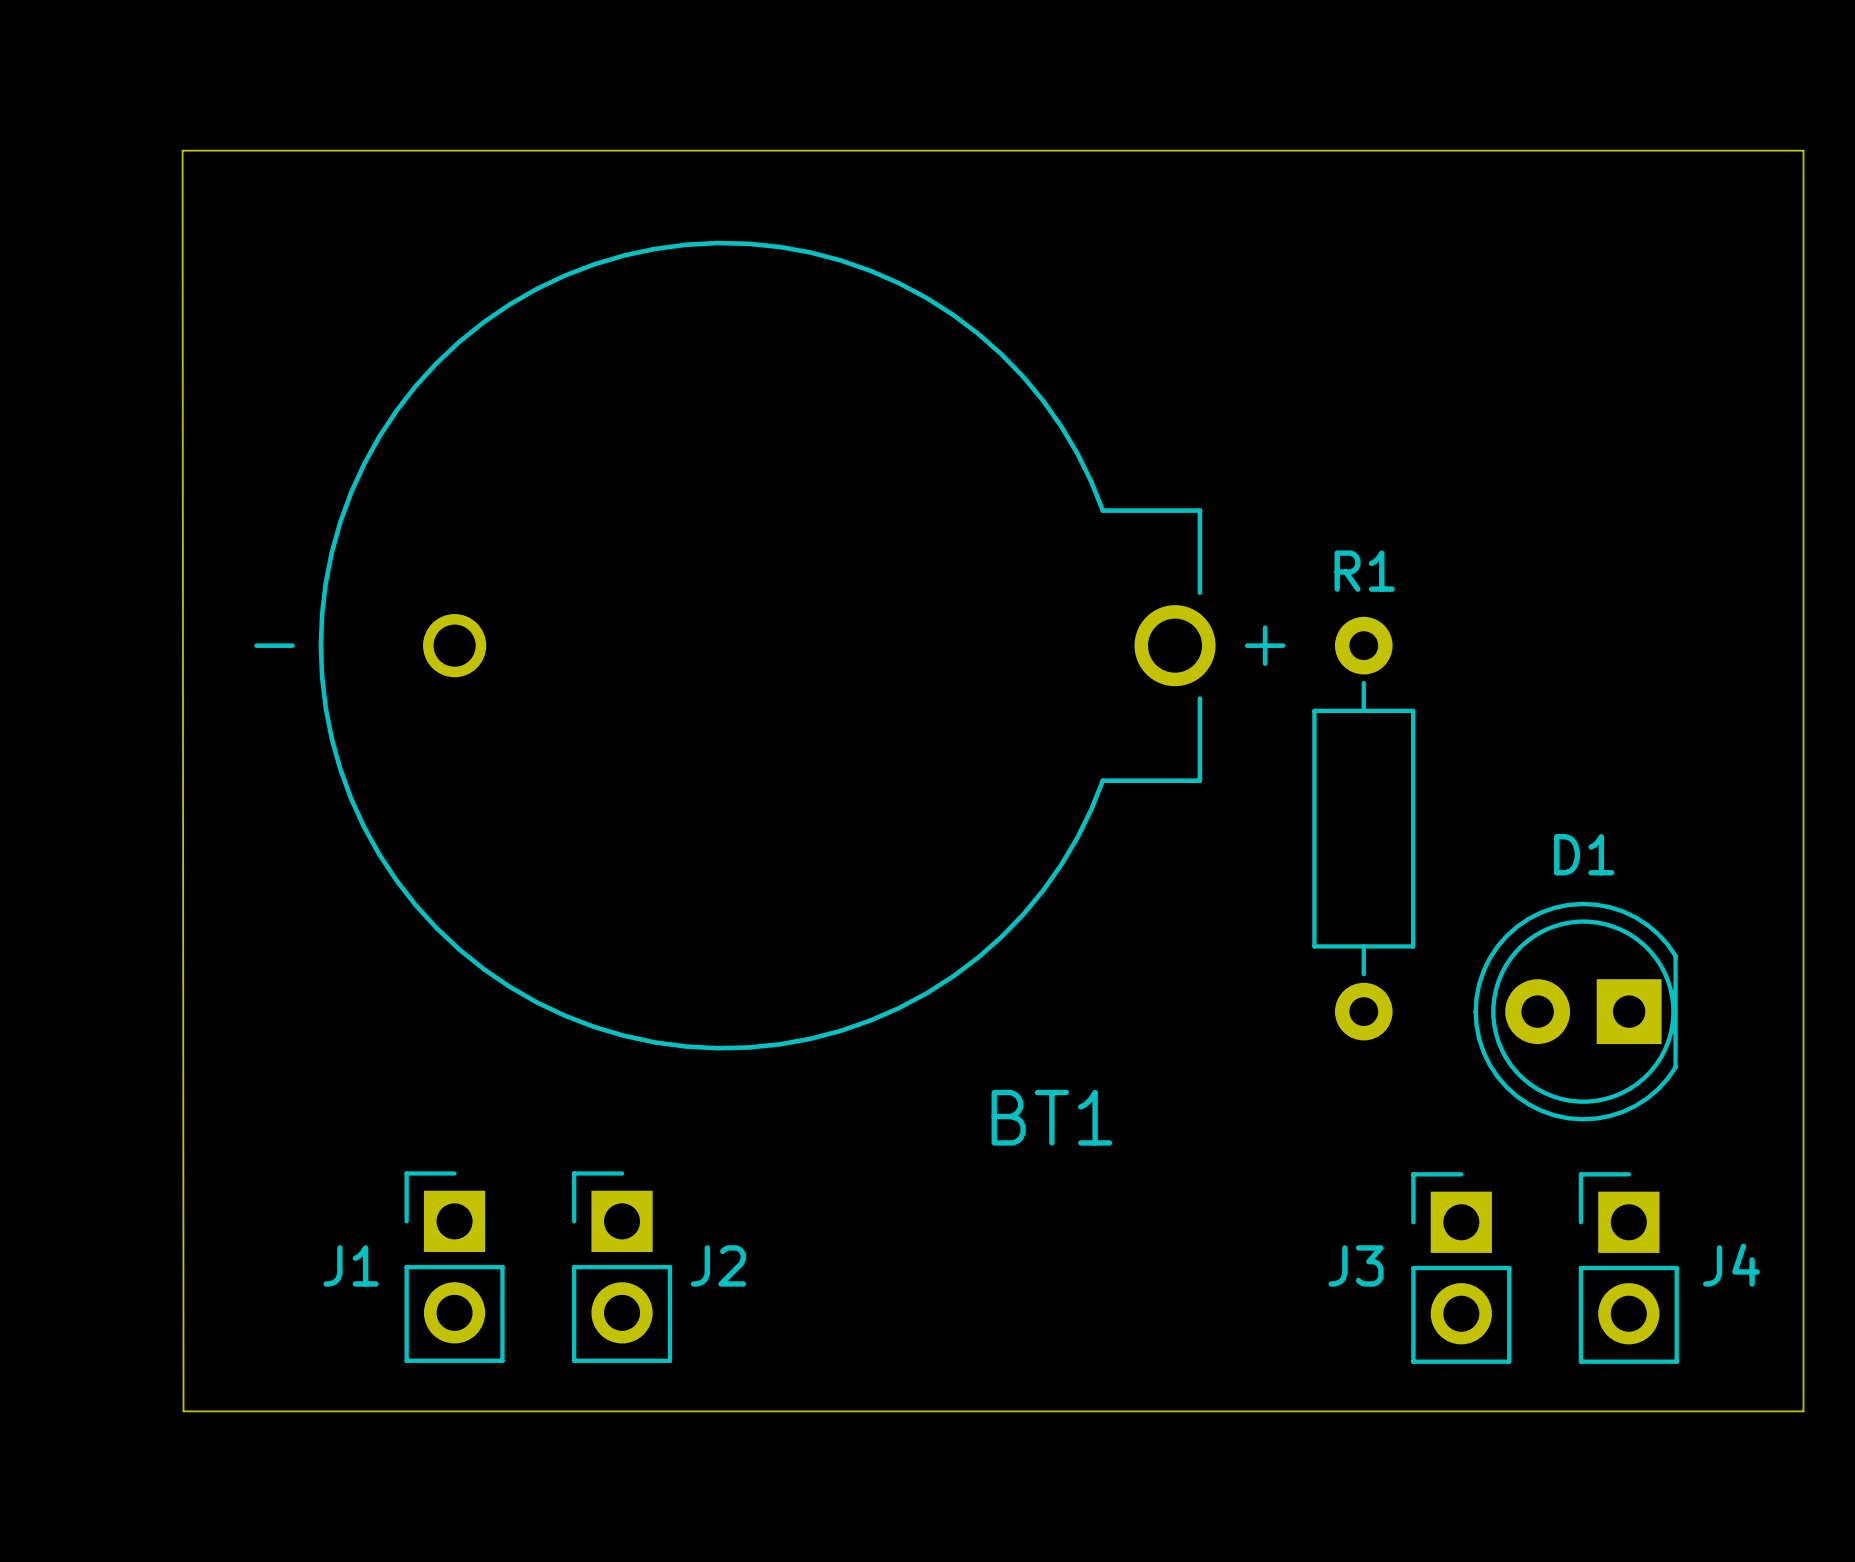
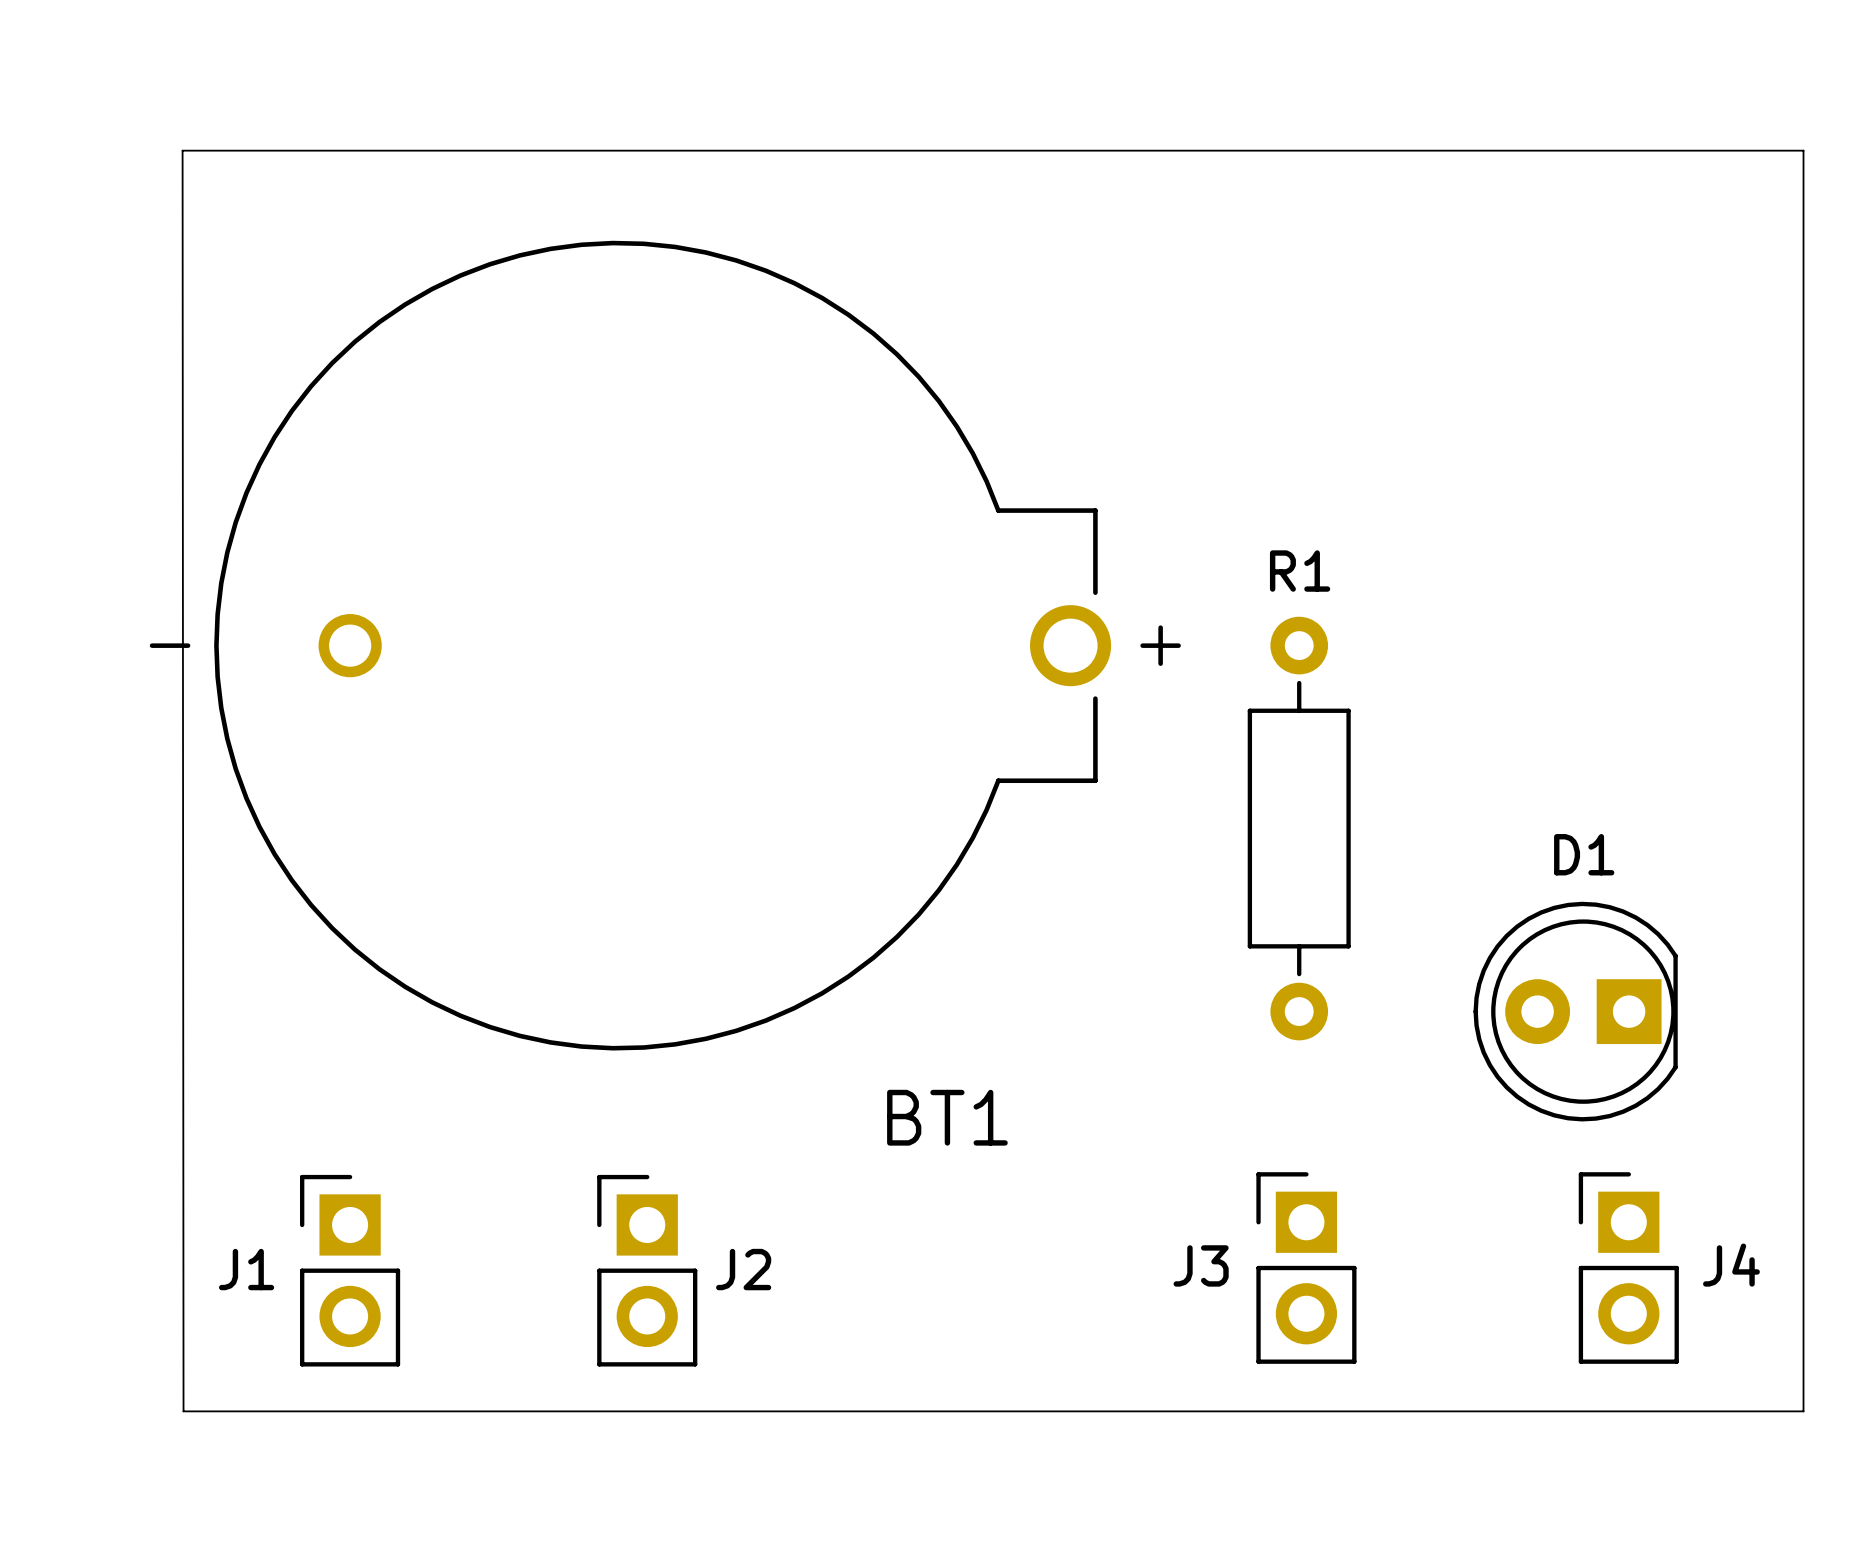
BT1 position: (769, 645) -> (665, 645)
R1 position: (1363, 828) -> (1299, 828)
J1 position: (454, 1267) -> (350, 1270)
J2 position: (622, 1267) -> (647, 1270)
J3 position: (1461, 1268) -> (1306, 1268)

